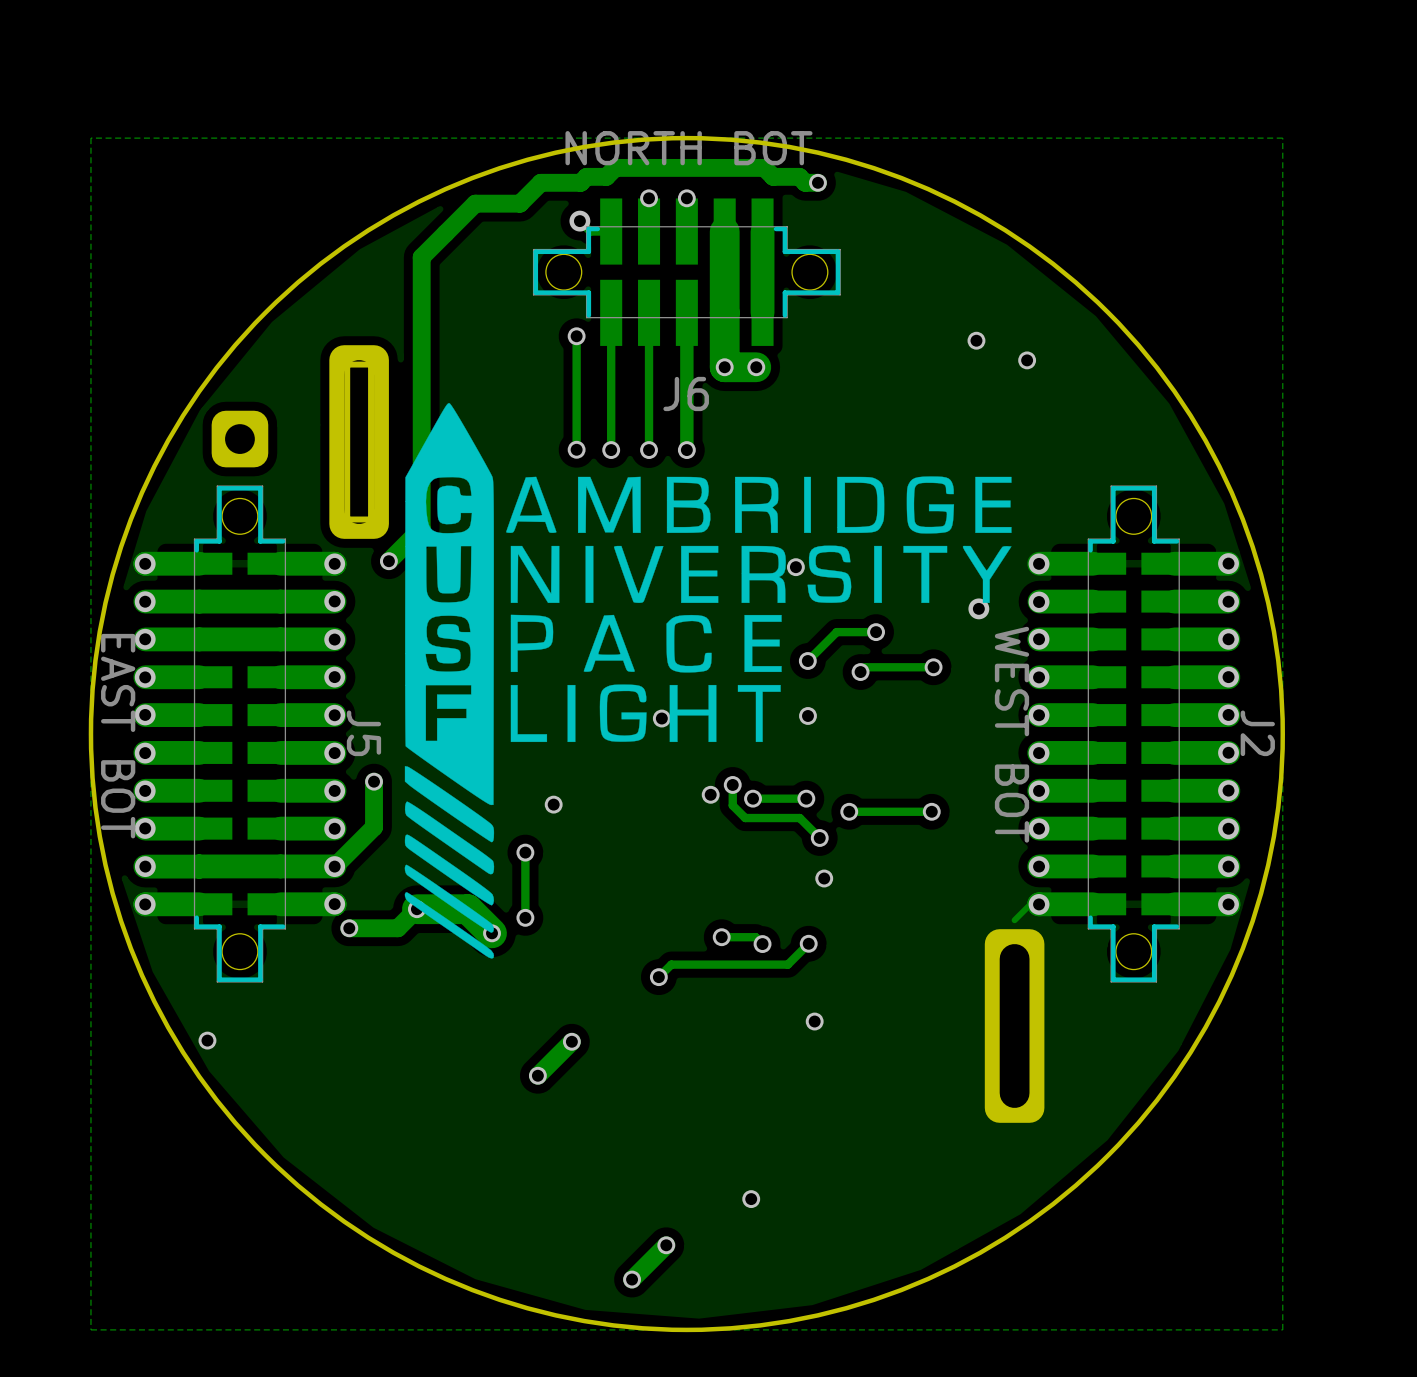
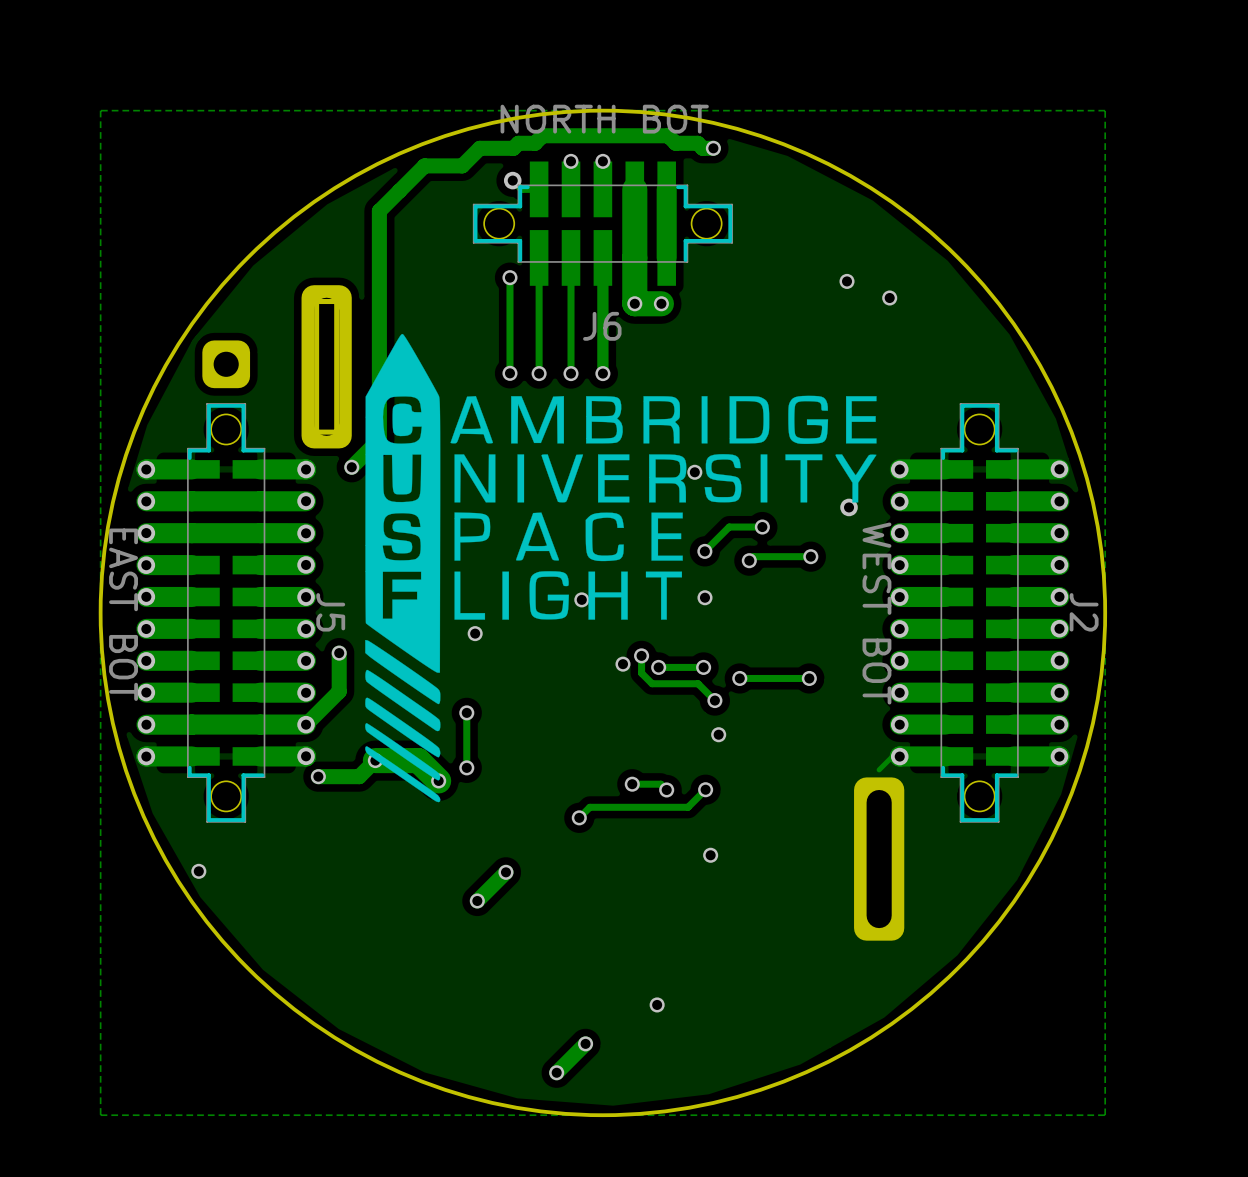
via position: (553, 804) -> (475, 633)

